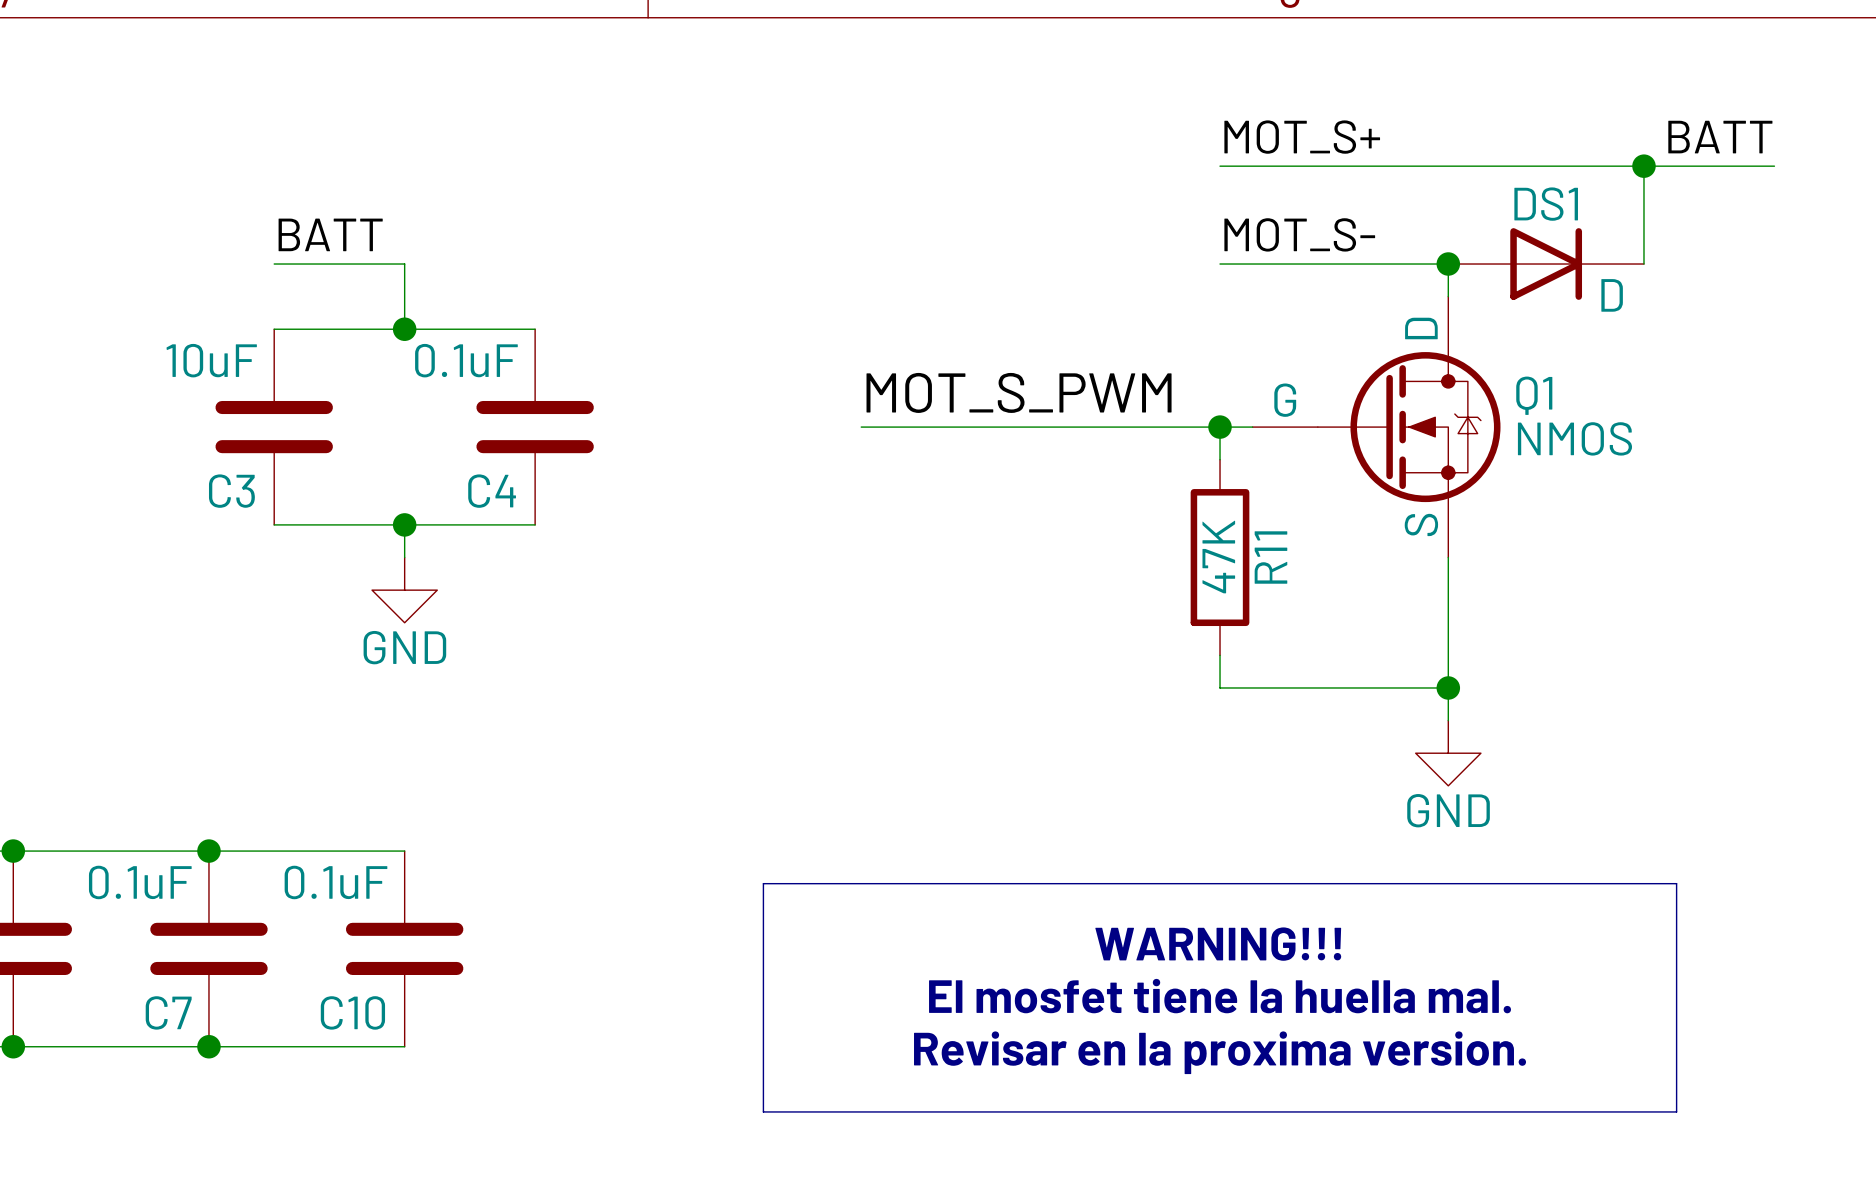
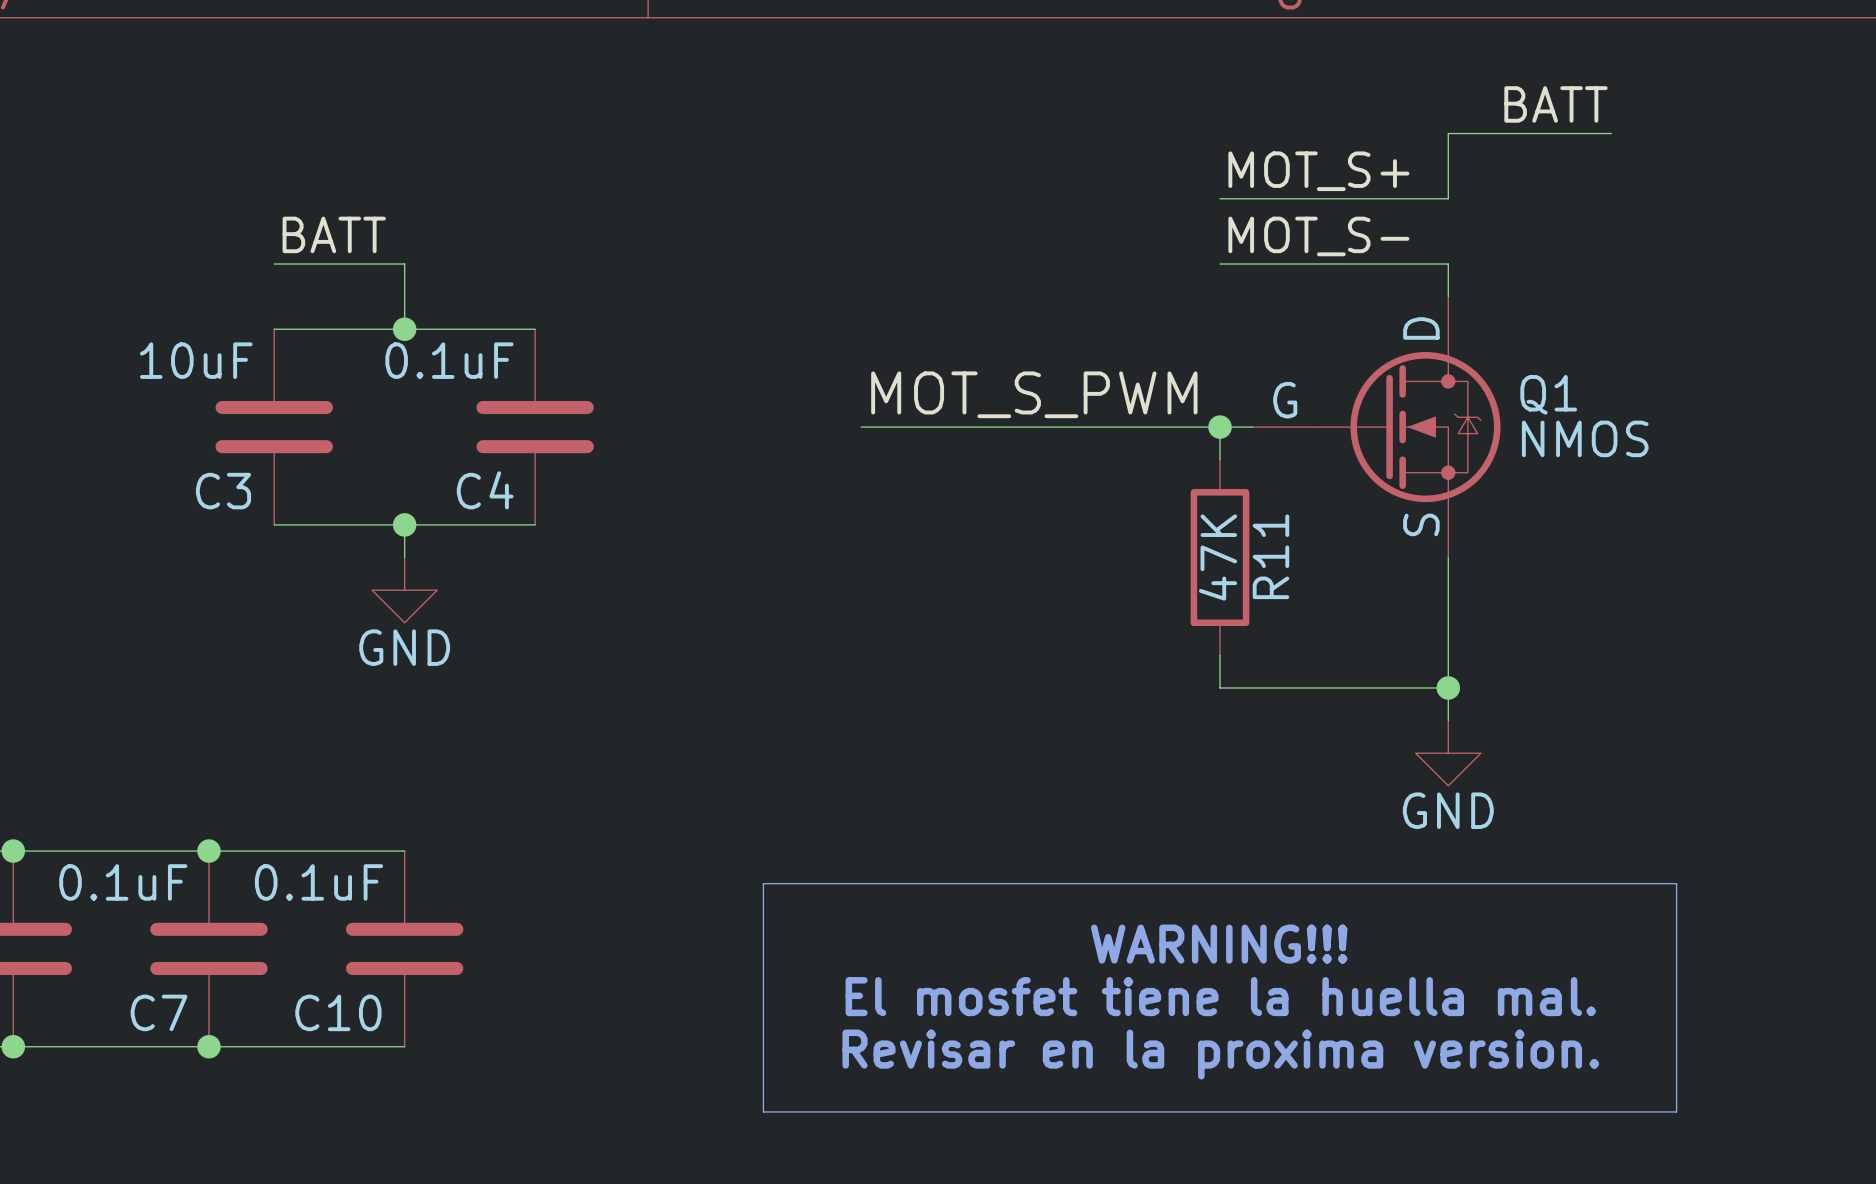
wire: none -> (1611, 133) (1448, 133) (1448, 198) (1220, 198)
label position: MOT_S+ (1302, 137) -> MOT_S+ (1318, 171)
label position: BATT (1720, 137) -> BATT (1555, 104)
wire: (1220, 166) (1774, 166) -> none
wire: (1643, 166) (1643, 264) -> none
junction: (1643, 166) -> none
junction: (1448, 264) -> none
DS1: D (1546, 264) -> none

